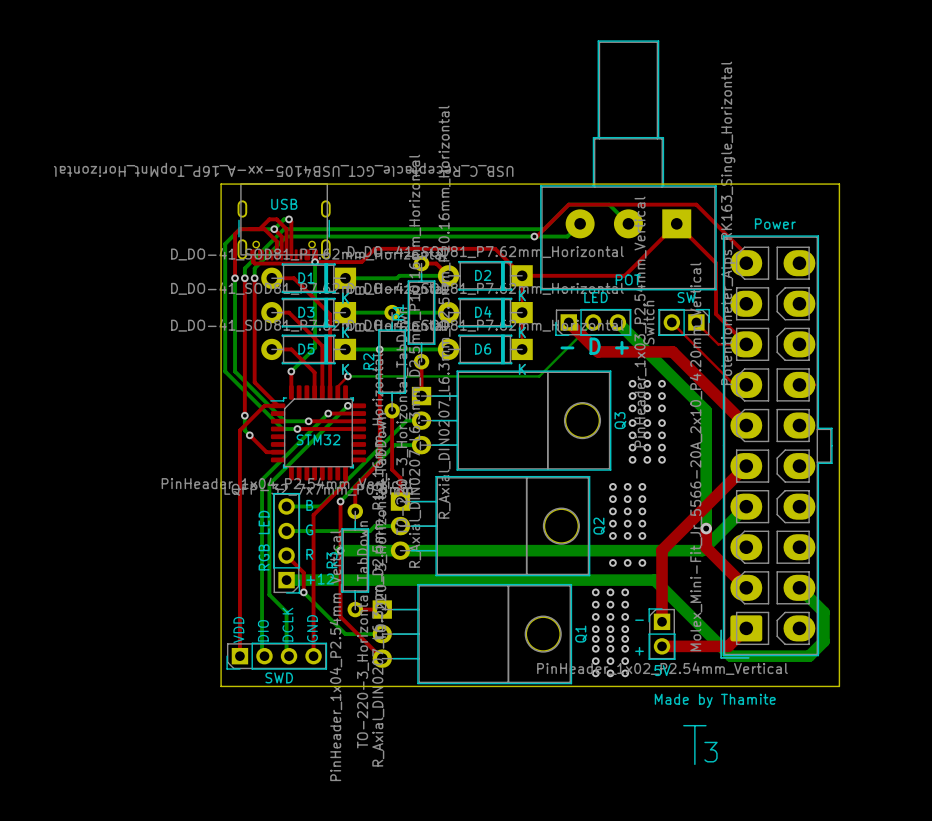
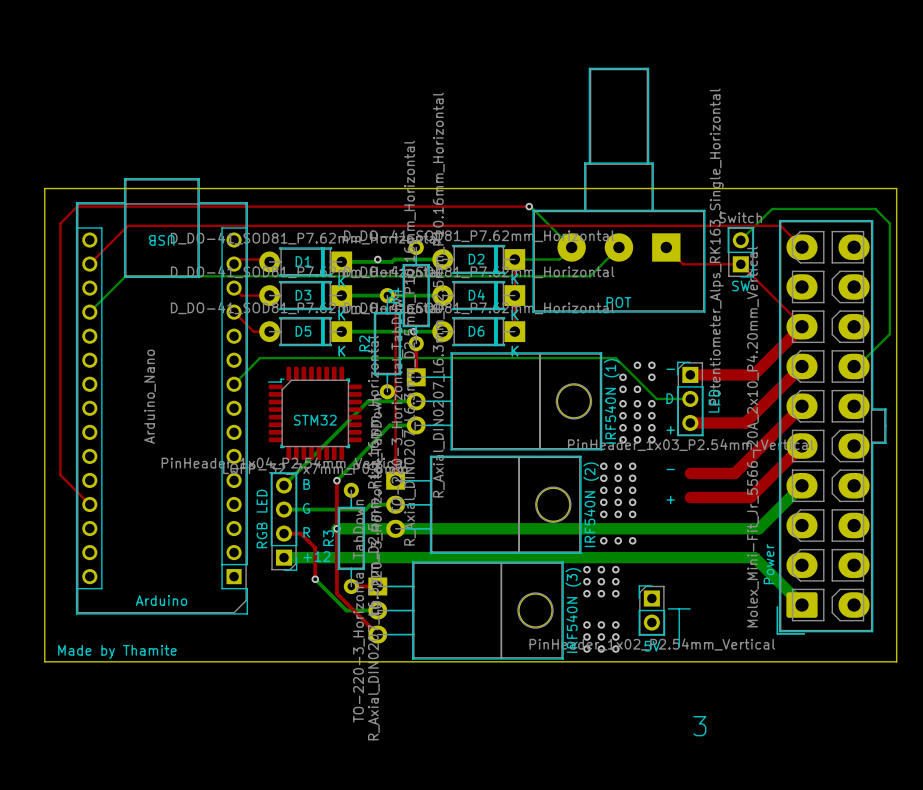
POT position: (628, 165) -> (618, 190)
top track: (289, 219) (291, 221) (291, 254) -> none
bottom track: (289, 219) (284, 219) (274, 229) (239, 229) (225, 243) (225, 371) (282, 429) (297, 429) -> none
via: (289, 219) -> none
USB: USB_C_Receptacle_GCT_USB4105-xx-A_16P_TopMnt_Horizontal (284, 221) -> none
top track: none -> (529, 206) (77, 206) (60, 223) (60, 475) (89, 504)
bottom track: none -> (529, 206) (571, 247) (559, 259) (514, 259)
bottom track: (580, 223) (567, 236) (286, 236) (254, 268) (254, 278) -> none
bottom track: (628, 223) (609, 204) (568, 204) (544, 229) (284, 229) (244, 268) (244, 278) -> none
Power name rotation: 0° (775, 223) -> 90° counterclockwise (768, 564)
Power name position: Power (775, 223) -> Power (768, 564)
top track: (259, 229) (269, 219) (276, 219) (286, 229) (286, 254) -> none
top track: (274, 229) (281, 236) (281, 254) -> none
via: (274, 229) -> none
top track: (534, 236) (536, 236) (568, 204) (696, 204) (746, 254) (746, 263) -> none
via position: (534, 236) -> (529, 206)
top track: (253, 254) (254, 263) (315, 262) -> none
top track: (276, 254) (276, 241) (264, 229) (239, 229) (235, 234) (235, 278) -> none
bottom track: none -> (740, 240) (772, 209) (875, 209) (889, 223) (889, 334) (857, 366) (854, 366)
top track: (315, 262) (361, 262) (374, 248) (495, 248) (522, 275) (624, 275) (676, 223) (716, 263) (716, 314) (746, 344) (718, 344) (696, 322) -> none
bottom track: (315, 262) (315, 347) (291, 371) -> none
via: (315, 262) -> none
top track: (421, 263) (436, 263) (448, 275) -> none
bottom track: none -> (618, 247) (590, 276) (125, 276) (89, 312)
top track: none -> (666, 247) (683, 264) (740, 264) (802, 325) (753, 374) (690, 374)
top track: none -> (802, 247) (780, 225) (128, 225) (89, 264)
top track: none -> (274, 259) (238, 259) (234, 264)
via: none -> (377, 259)
bottom track: (235, 278) (235, 371) (284, 421) (308, 421) -> none
via: (235, 278) -> none
top track: (244, 278) (244, 415) -> none
via: (244, 278) -> none
top track: (254, 278) (254, 382) (278, 405) (264, 405) (239, 430) (239, 656) -> none
via: (254, 278) -> none
top track: (271, 278) (293, 278) (330, 314) (330, 392) -> none
SW name position: SW (686, 297) -> SW (741, 286)
top track: (276, 312) (289, 312) (322, 345) (322, 392) -> (274, 295) (241, 295) (234, 288)
top track: (568, 322) (598, 351) (672, 351) (746, 425) -> none
bottom track: (593, 322) (539, 376) -> (690, 398) (656, 398) (615, 358) (531, 358)
LED rotation: 0° (593, 322) -> 90° clockwise (690, 398)
LED position: (593, 322) -> (690, 398)
bottom track: (617, 322) (706, 410) (706, 528) -> none
top track: (671, 322) (734, 384) (746, 384) -> none
SW rotation: 0° (684, 322) -> 90° clockwise (740, 252)
SW position: (684, 322) -> (740, 252)
text: - D + (594, 346) -> none
top track: (276, 349) (291, 349) (314, 372) (314, 392) -> (274, 331) (253, 331) (234, 312) (235, 312)
top track: (379, 349) (379, 462) (355, 486) (355, 511) (357, 511) -> none
via: (379, 349) -> none
via: none -> (413, 331)
top track: (291, 371) (291, 392) -> none
via: (291, 371) -> none
top track: (347, 376) (337, 386) (337, 392) -> none
bottom track: none -> (344, 358) (259, 358) (234, 384)
via: (347, 376) -> none
via: (632, 383) -> none
top track: none -> (802, 366) (745, 422) (690, 422)
text: none -> - (670, 369)
via: (647, 396) -> none
bottom track: (347, 405) (269, 484) (269, 594) (286, 612) (286, 653) (289, 656) -> none
via: (347, 405) -> none
via: (662, 408) -> none
top track: (392, 410) (392, 469) (400, 478) -> (394, 295) (395, 457)
top track: (328, 413) (358, 413) -> none
bottom track: (328, 413) (262, 479) (262, 653) (264, 656) -> none
via: (328, 413) -> none
Arduino: none -> Arduino_Nano (161, 396)
bottom track: (244, 415) (244, 430) (249, 435) -> none
via: (244, 415) -> none
text: none -> D (669, 398)
bottom track: (406, 420) (320, 506) (286, 506) -> (401, 401) (368, 401) (284, 485)
Q3 name: Q3 (620, 420) -> IRF540N (1) (611, 401)
top track: (308, 421) (358, 421) -> none
via: (308, 421) -> none
top track: none -> (802, 406) (734, 473) (690, 473)
top track: (297, 429) (358, 429) -> none
via: (297, 429) -> none
top track: (249, 435) (266, 452) (278, 452) -> none
via: (249, 435) -> none
Power position: (776, 446) -> (831, 427)
text: none -> + (670, 430)
top track: (746, 466) (662, 550) (662, 621) -> none
top track: none -> (802, 446) (750, 497) (690, 497)
top track: (345, 473) (345, 483) (313, 515) (313, 656) -> none
text: none -> - (670, 469)
bottom track: (746, 506) (702, 550) -> (802, 485) (758, 528) (691, 528)
text: none -> + (670, 499)
Q2 name: Q2 (599, 526) -> IRF540N (2) (591, 504)
top track: (706, 528) (706, 547) (746, 587) -> none
via: (706, 528) -> none
top track: (286, 555) (303, 572) (303, 592) -> (284, 533) (300, 533) (315, 548) (315, 579)
bottom track: (654, 580) (730, 656) (809, 656) (823, 641) (823, 612) (799, 587) -> (644, 557) (754, 557) (802, 605)
bottom track: (303, 592) (345, 634) (350, 634) -> (315, 579) (346, 610)
via position: (303, 592) -> (315, 579)
text: - (639, 620) -> none
text: DCLK (287, 624) -> none
text: GND (312, 628) -> none
top track: (746, 628) (728, 646) (662, 646) -> none
text: VDD (238, 629) -> none
via: (595, 629) -> none
via: (610, 629) -> none
via: (625, 629) -> none
text: DIO (263, 630) -> none
Q1 name: Q1 (581, 634) -> IRF540N (3) (573, 610)
via: (595, 639) -> none
via: (610, 639) -> none
via: (625, 639) -> none
text: + (639, 651) -> none
SWD: PinHeader_1x04_P2.54mm_Vertical (276, 656) -> none
text: none -> Made by Thamite (117, 651)
board edge: (221, 686) (221, 184) (839, 184) (839, 686) -> (219, 661) (44, 661) (44, 188) (896, 188) (896, 661) (825, 661)
text: Made by Thamite (715, 700) -> none
text position: T (694, 745) -> T (679, 627)

